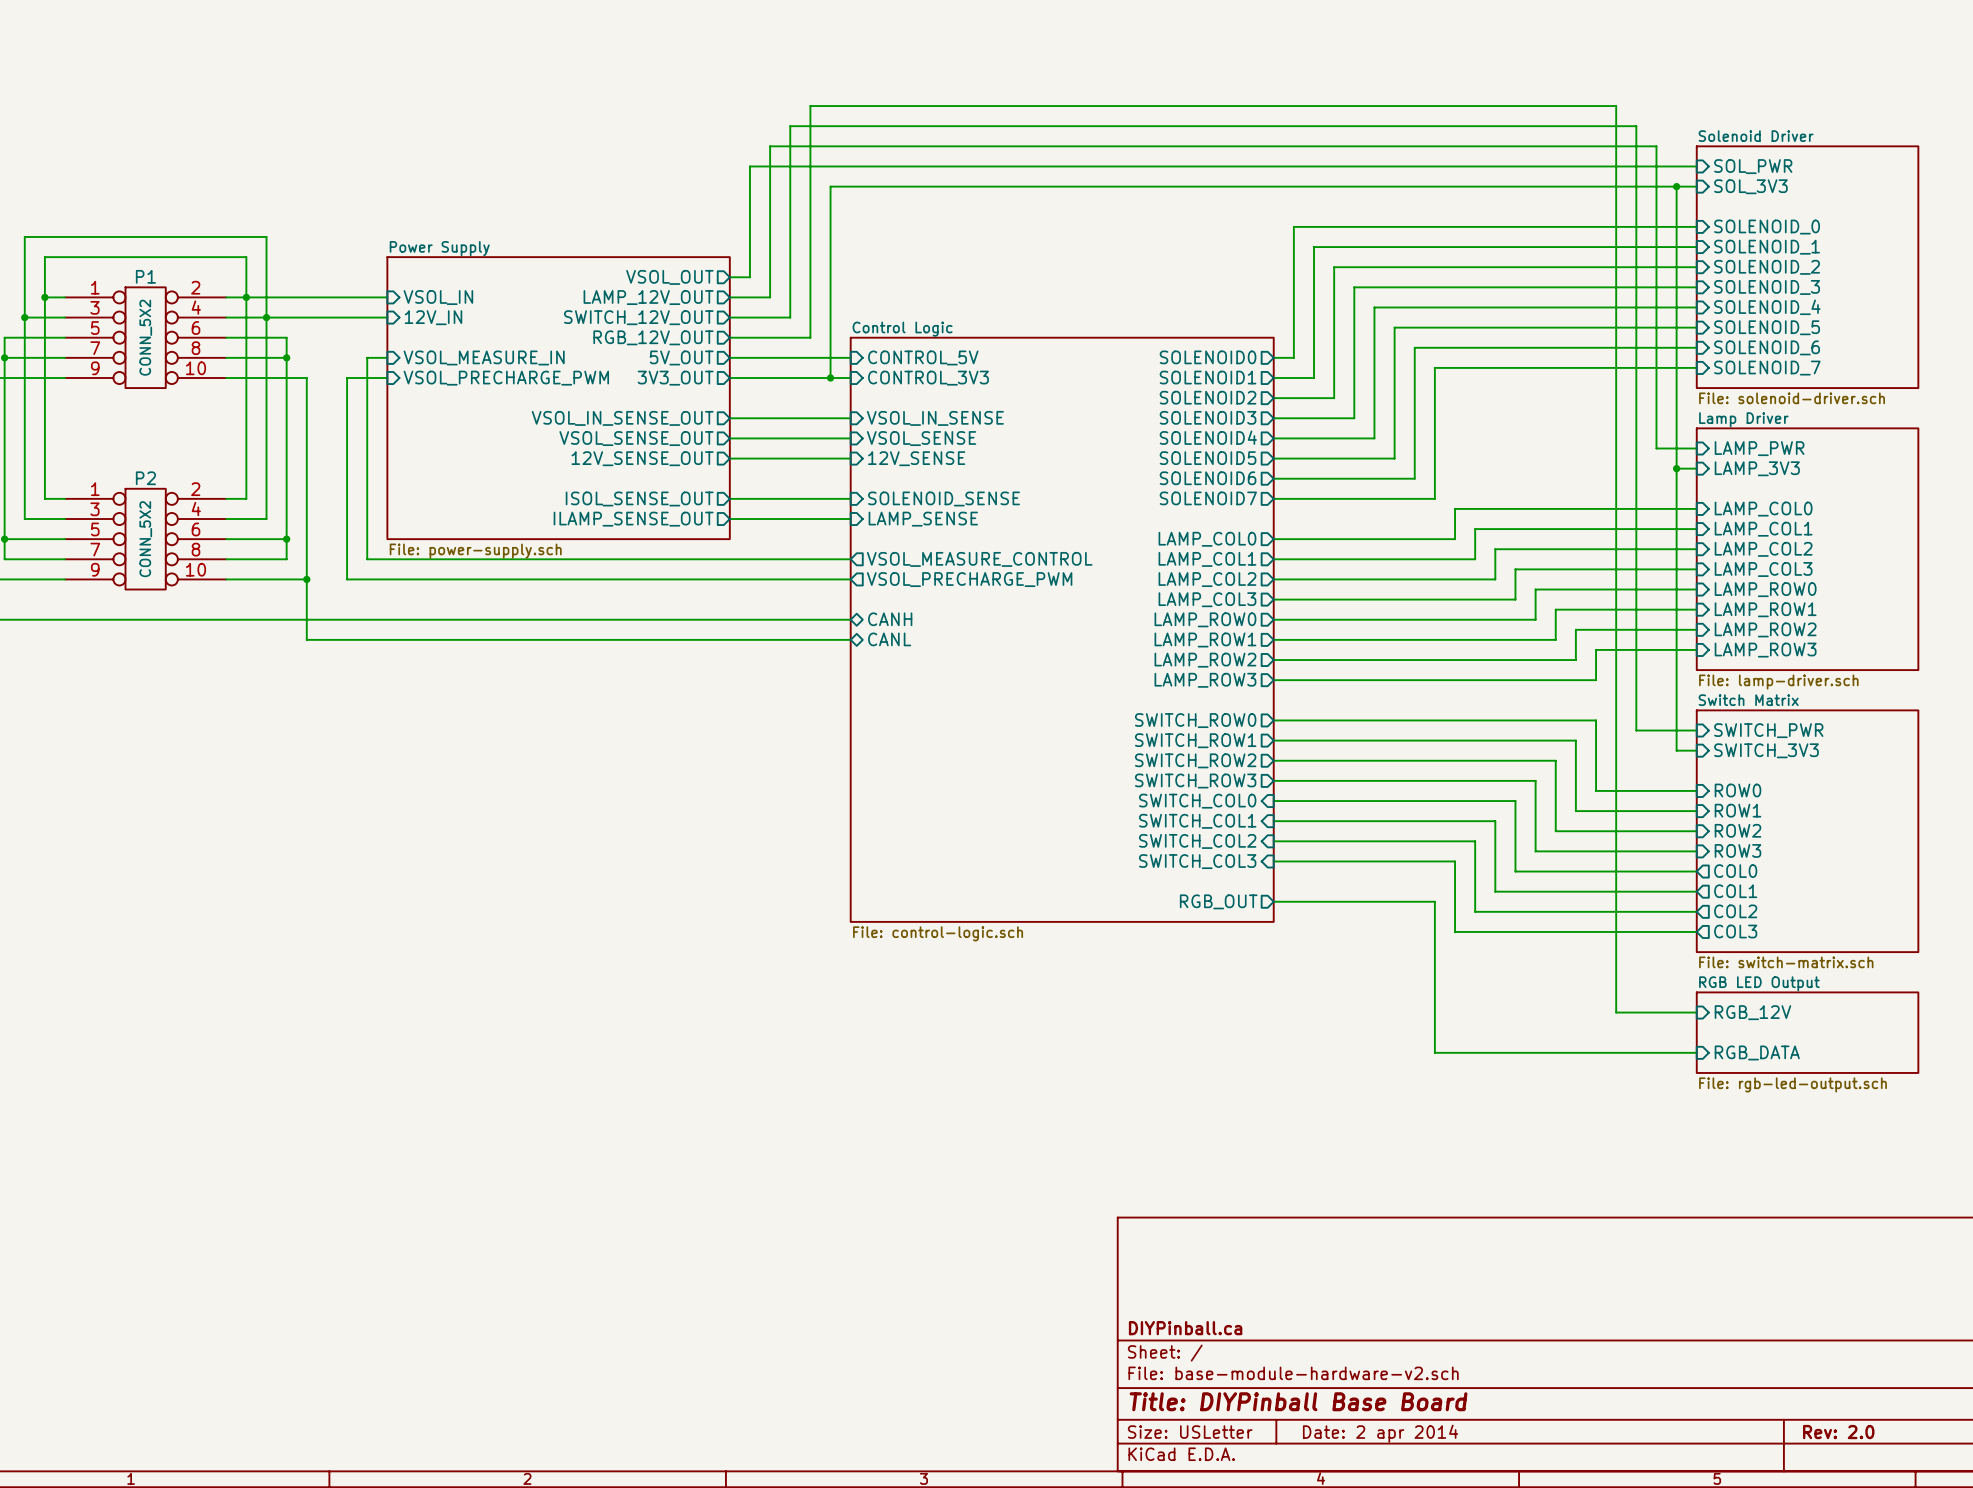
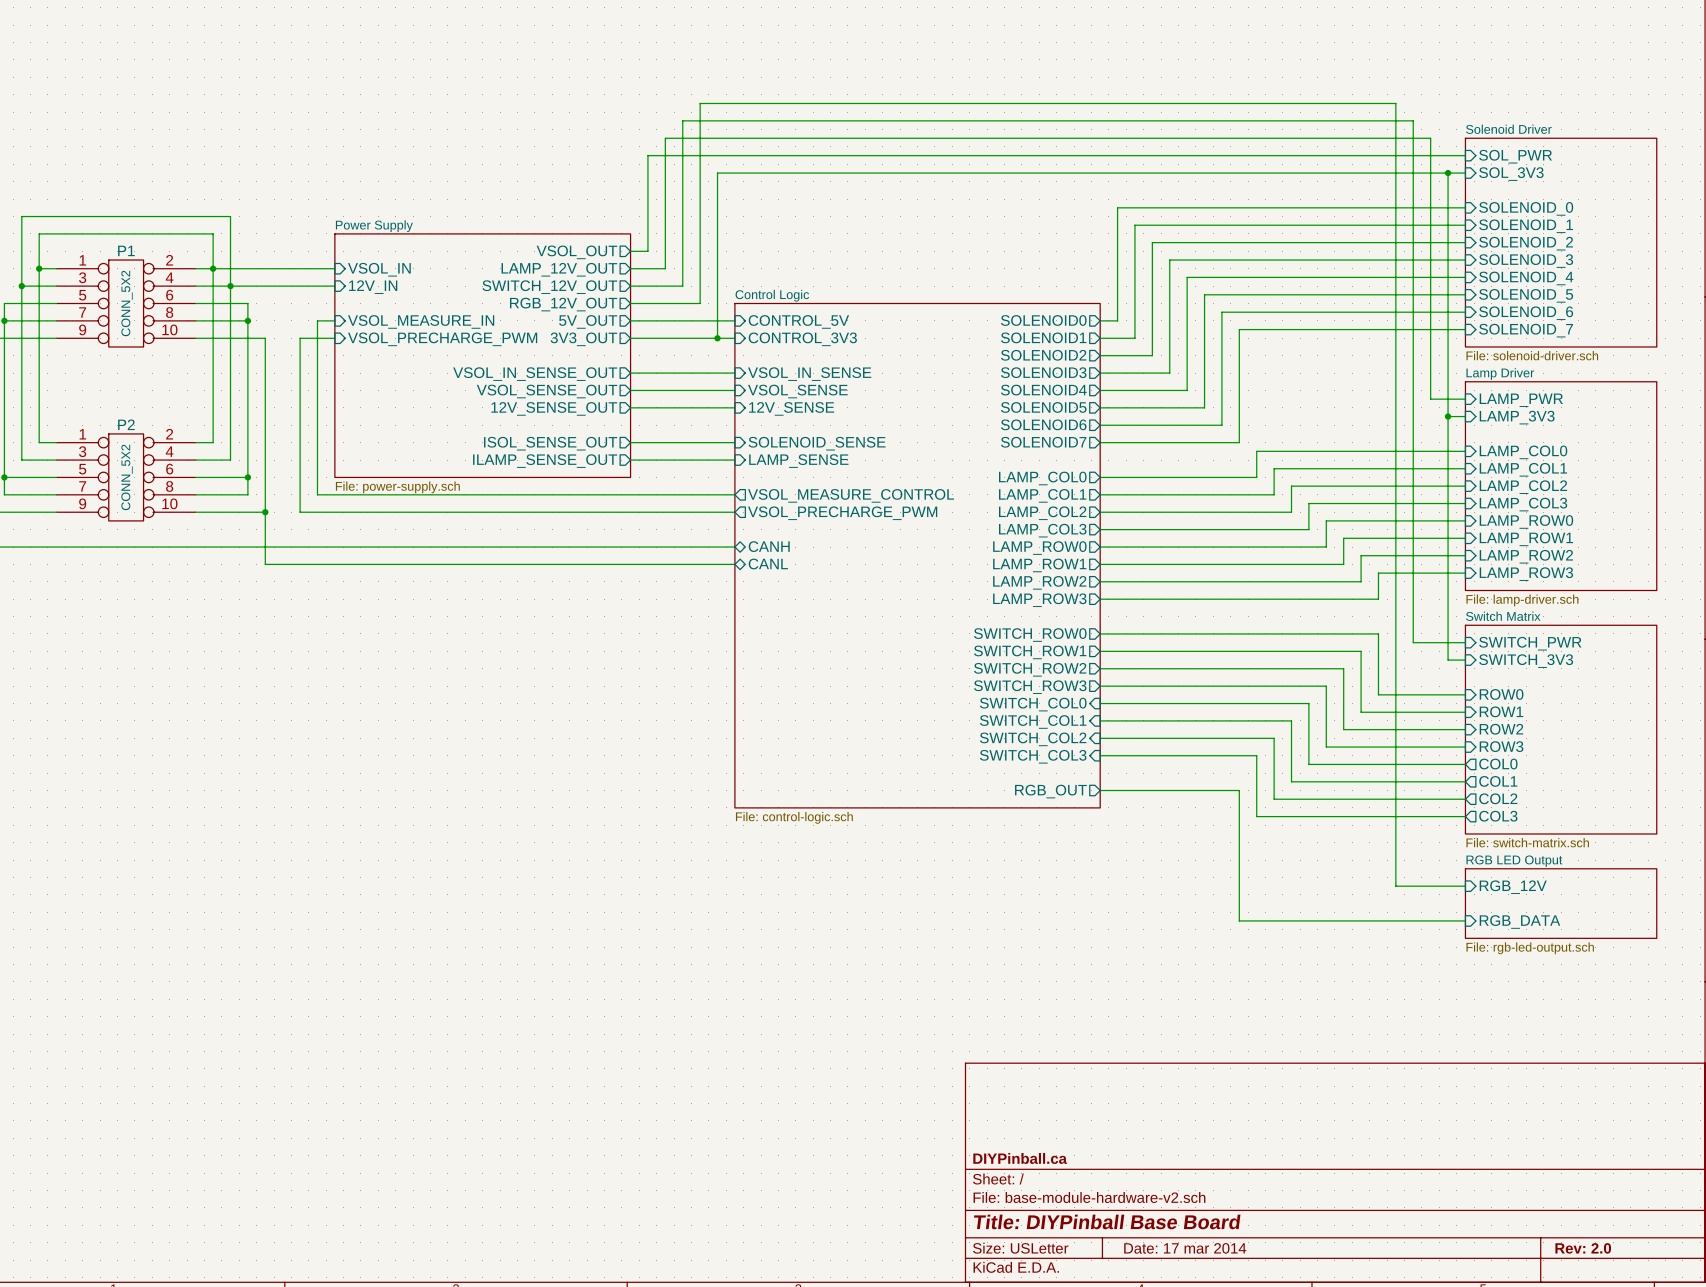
title block: Date: 2 apr 2014 (1380, 1433) -> Date: 17 mar 2014 (1185, 1248)

